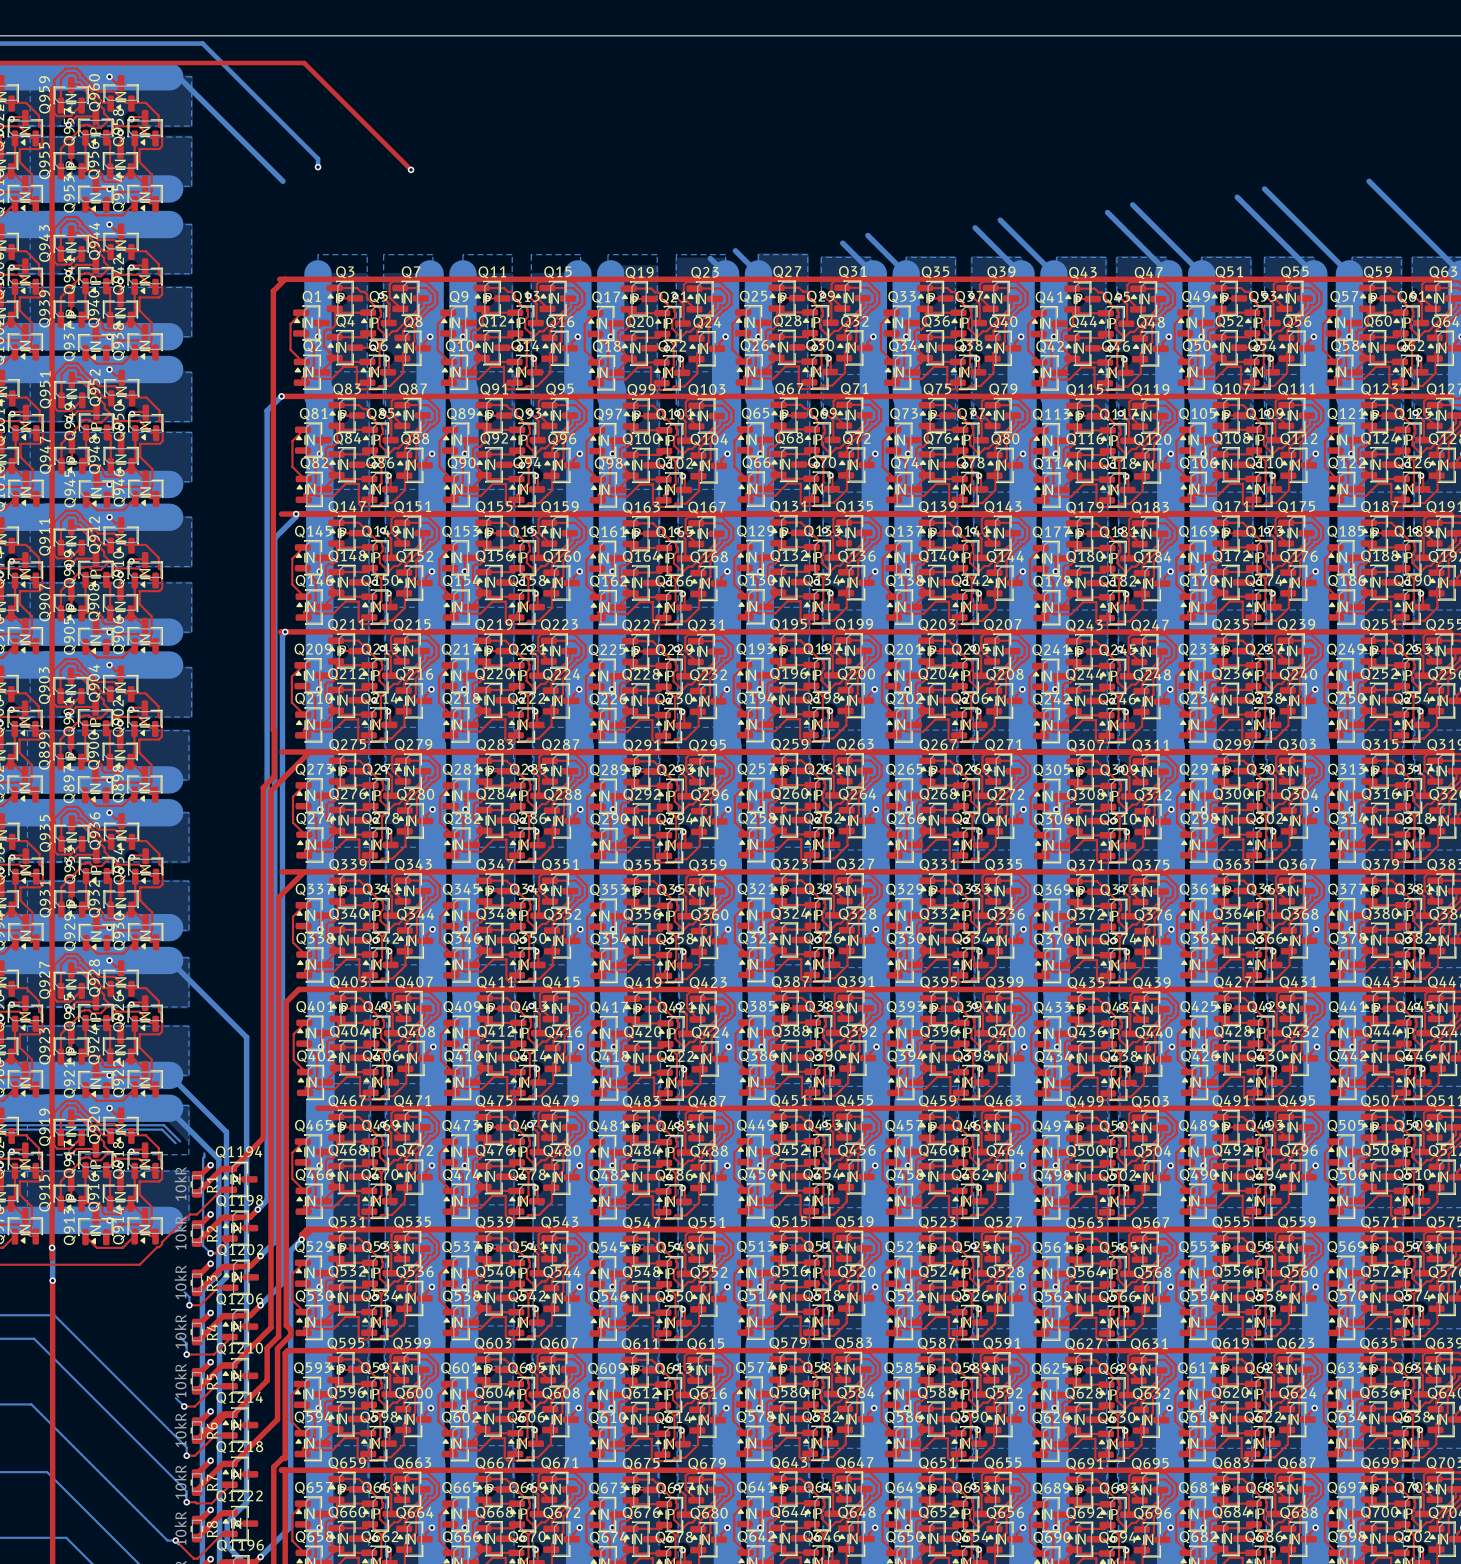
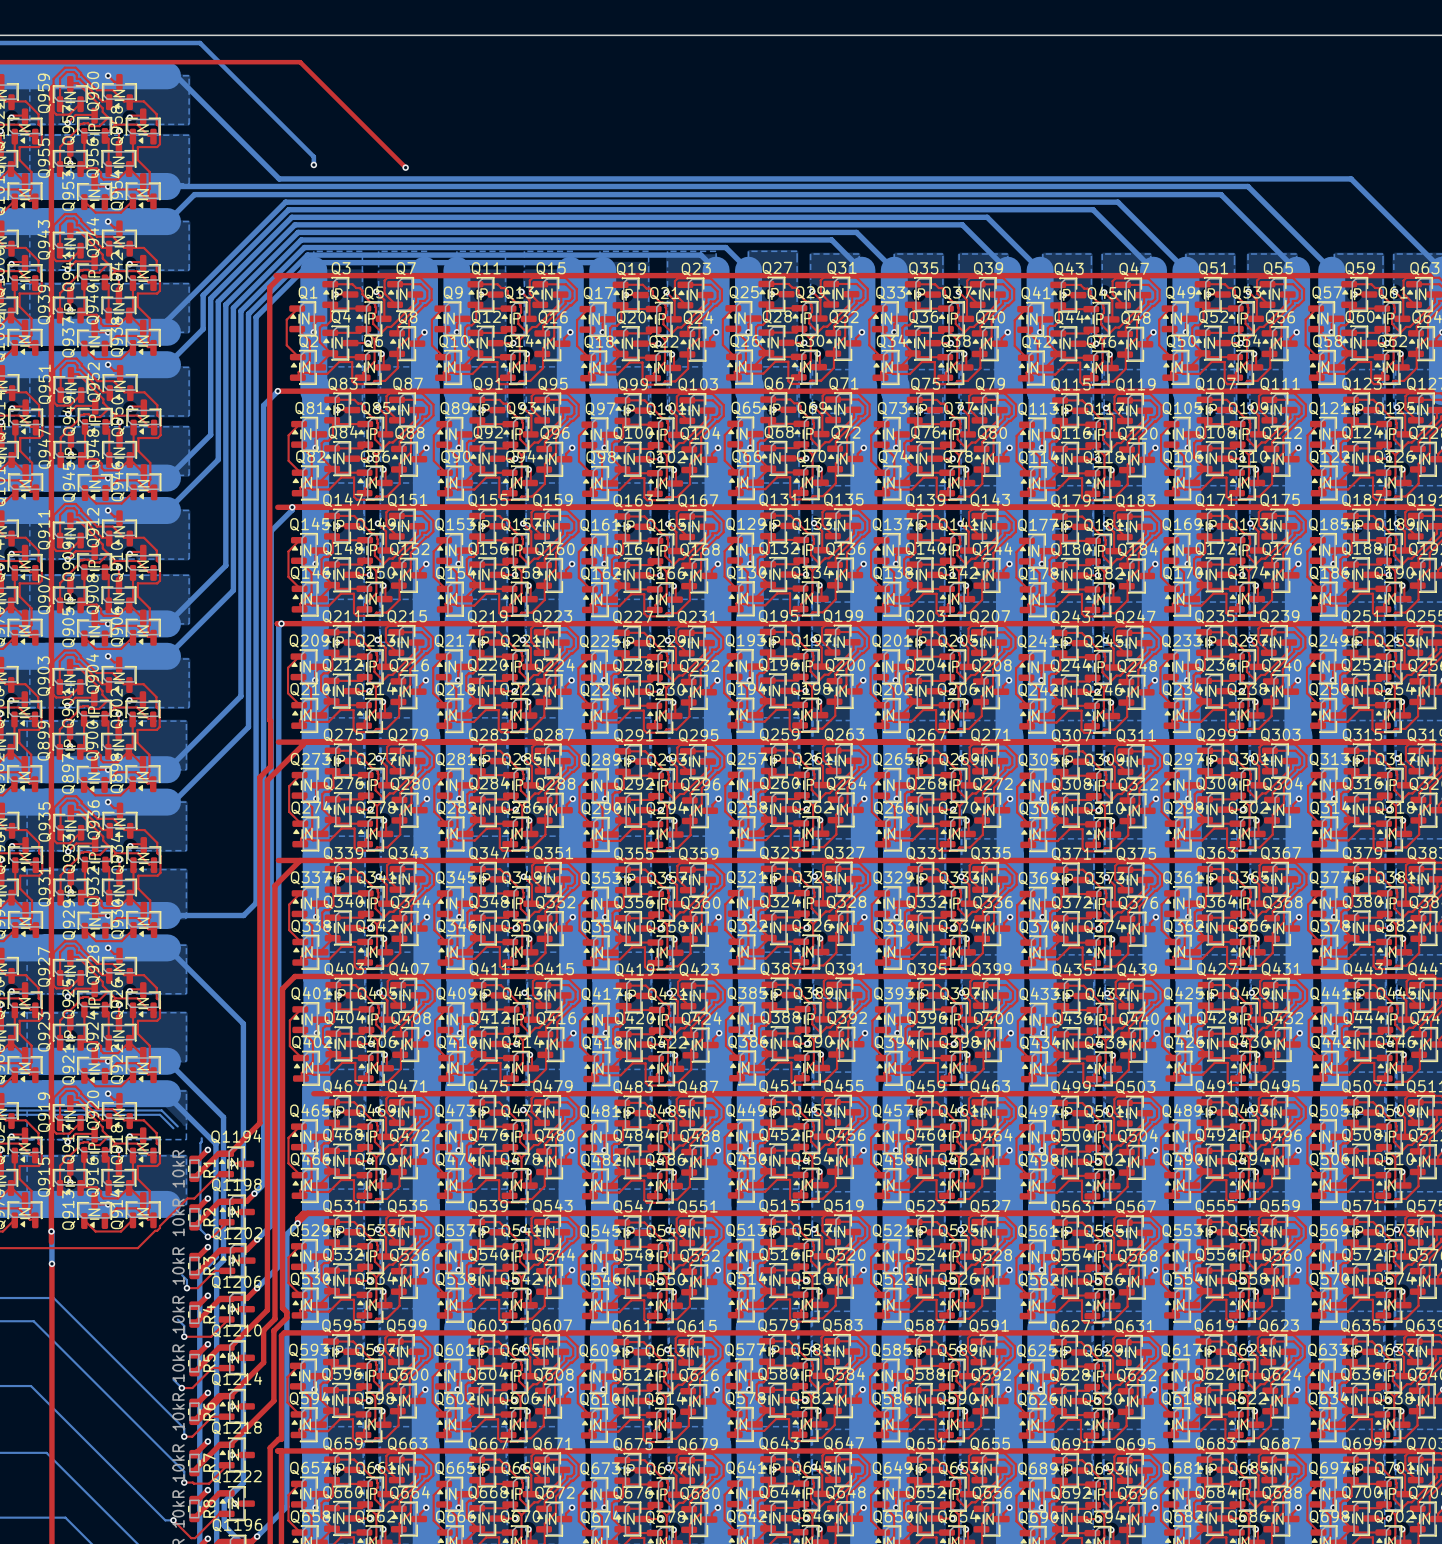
bottom track: none -> (279, 178) (1351, 178)
bottom track: none -> (108, 186) (1248, 186)
bottom track: none -> (1221, 194) (194, 194) (167, 221)
bottom track: none -> (1117, 202) (285, 202) (167, 320) (167, 332)
bottom track: none -> (1093, 209) (288, 209) (203, 295) (203, 329) (167, 364)
bottom track: none -> (987, 217) (291, 217) (210, 298) (210, 434) (167, 478)
bottom track: none -> (962, 224) (295, 224) (218, 301) (218, 459) (167, 510)
bottom track: none -> (856, 232) (298, 232) (225, 304) (225, 565) (167, 623)
bottom track: none -> (831, 239) (301, 239) (233, 307) (233, 590) (167, 656) (108, 656)
bottom track: none -> (725, 247) (304, 247) (240, 310) (240, 696) (167, 769) (108, 769)
bottom track: none -> (700, 255) (307, 255) (248, 314) (248, 727) (173, 802) (108, 802)
bottom track: none -> (595, 262) (310, 262) (256, 317) (256, 903) (243, 915) (108, 915)

